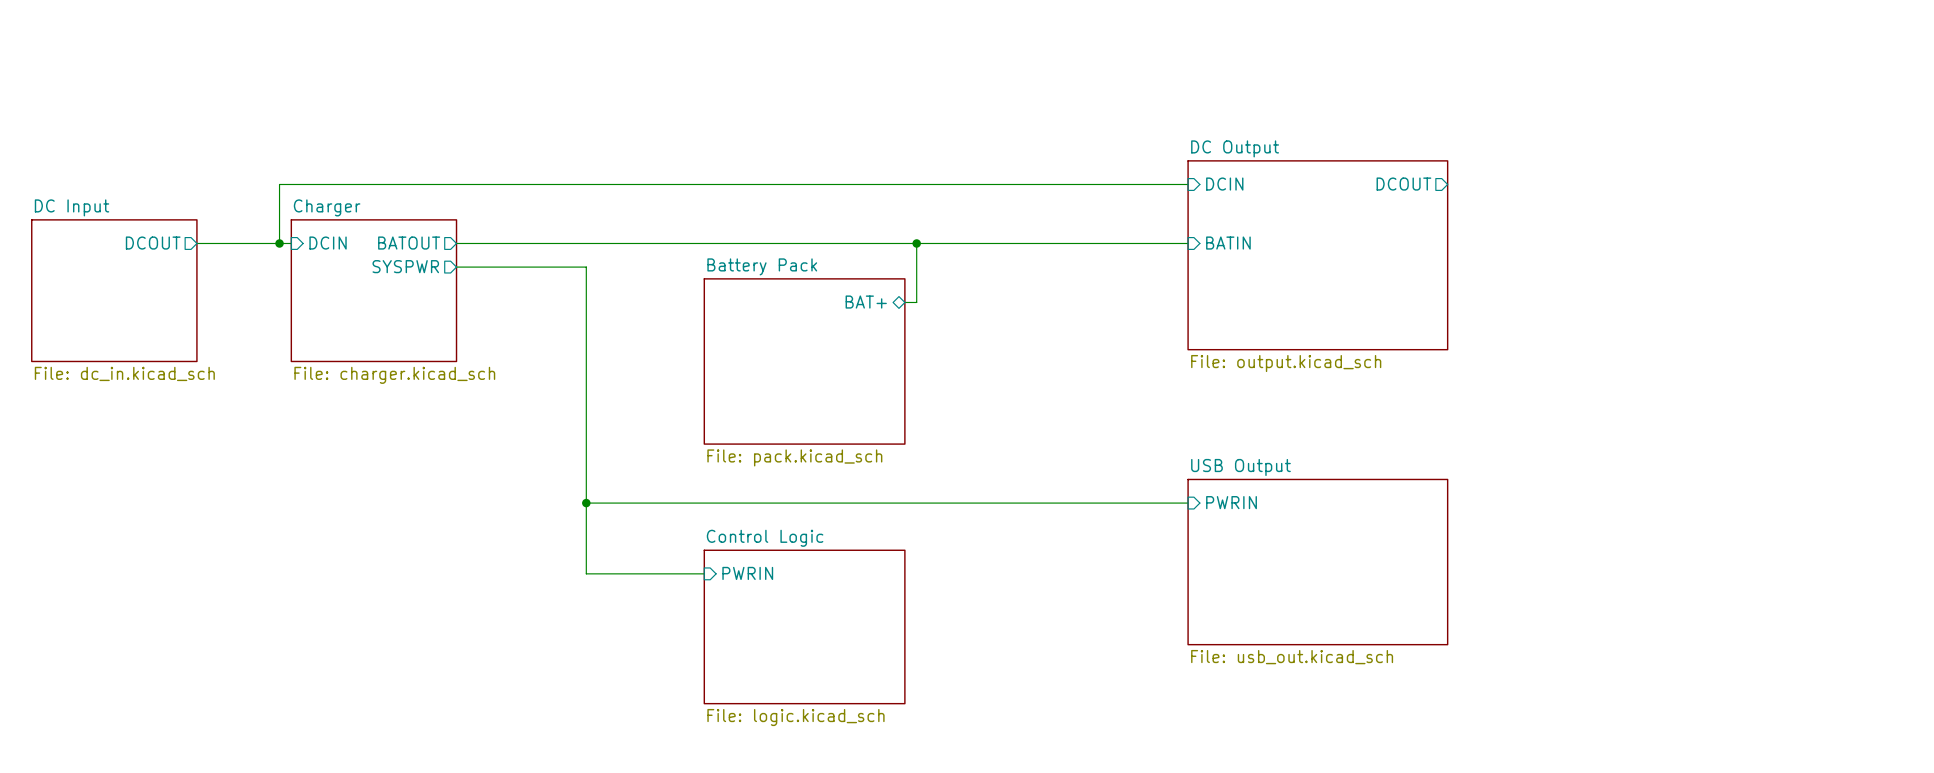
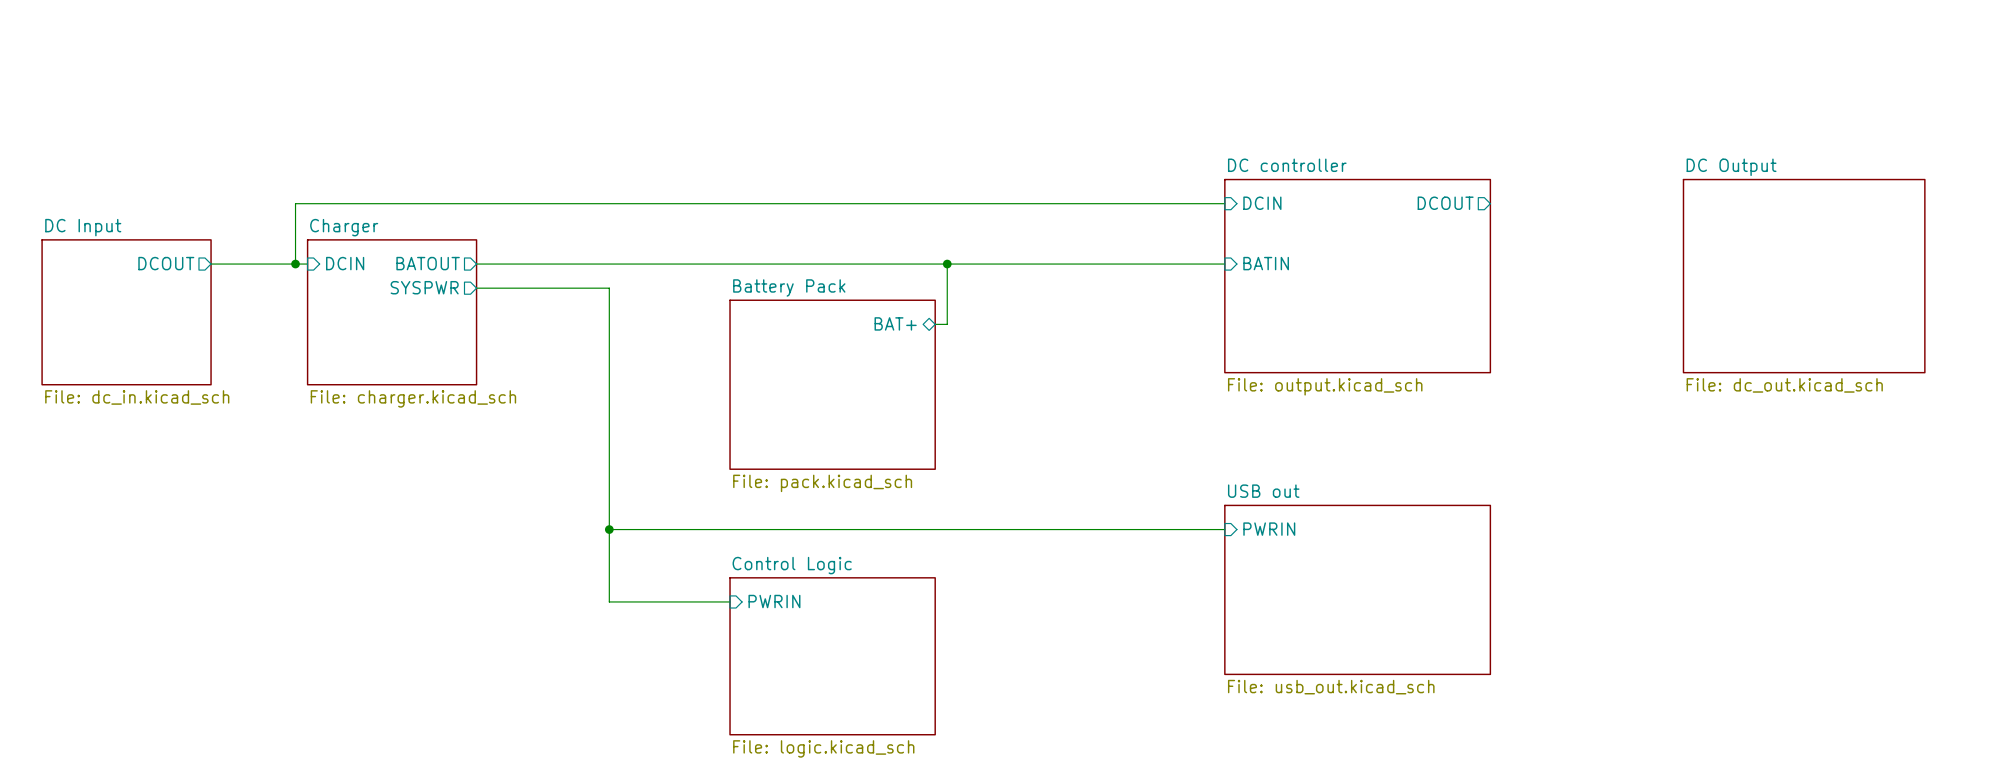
sheet DC Output name: DC Output (1235, 148) -> DC controller (1287, 165)
sheet DC Output: none -> File: dc_out.kicad_sch (1804, 276)
sheet USB Output name: USB Output (1240, 467) -> USB out (1263, 491)

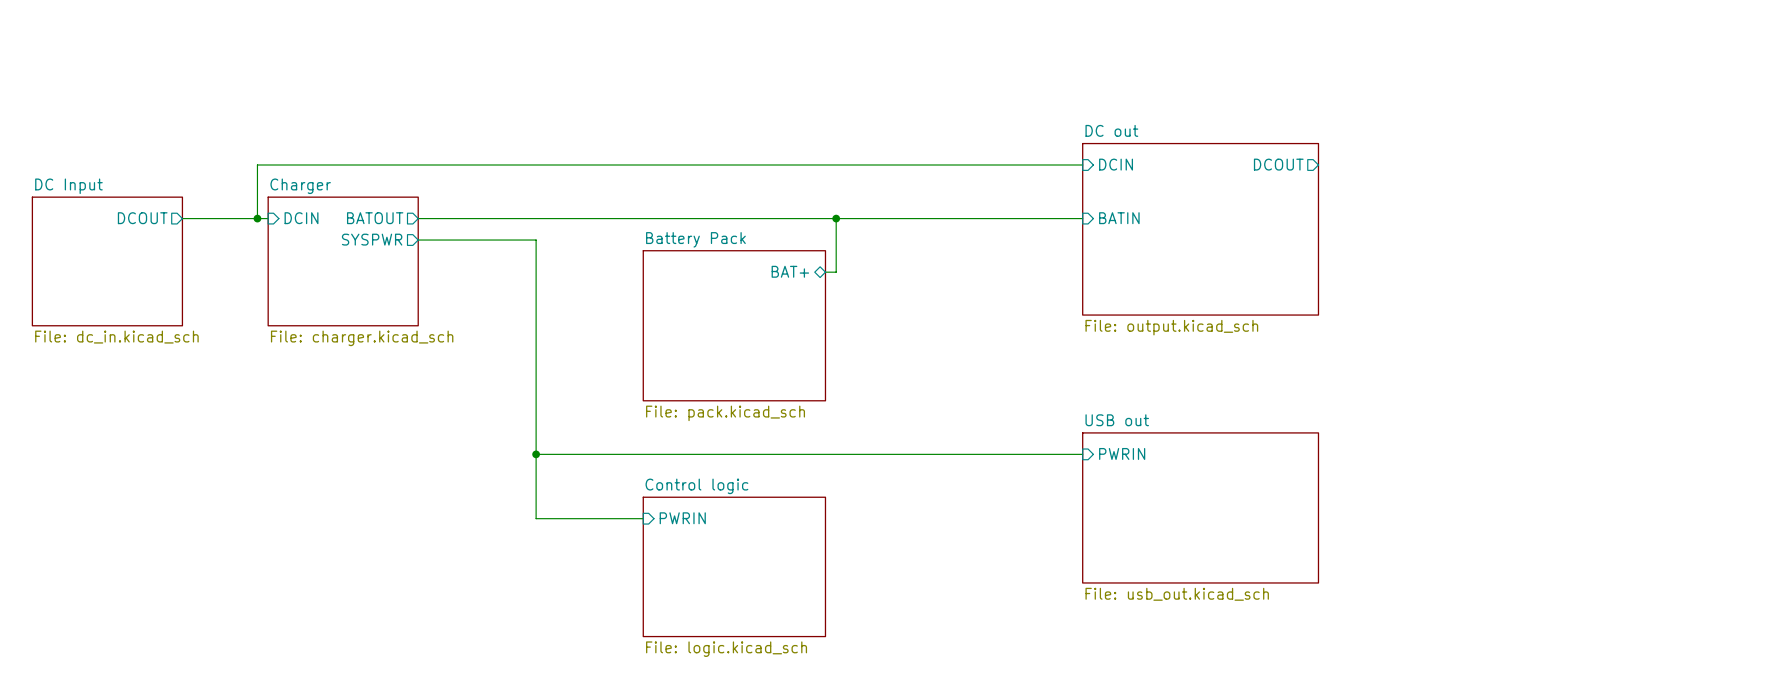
sheet DC controller name: DC controller (1287, 165) -> DC out (1111, 130)
sheet DC Output: File: dc_out.kicad_sch (1804, 276) -> none
sheet Control Logic name: Control Logic (792, 565) -> Control logic (696, 486)

